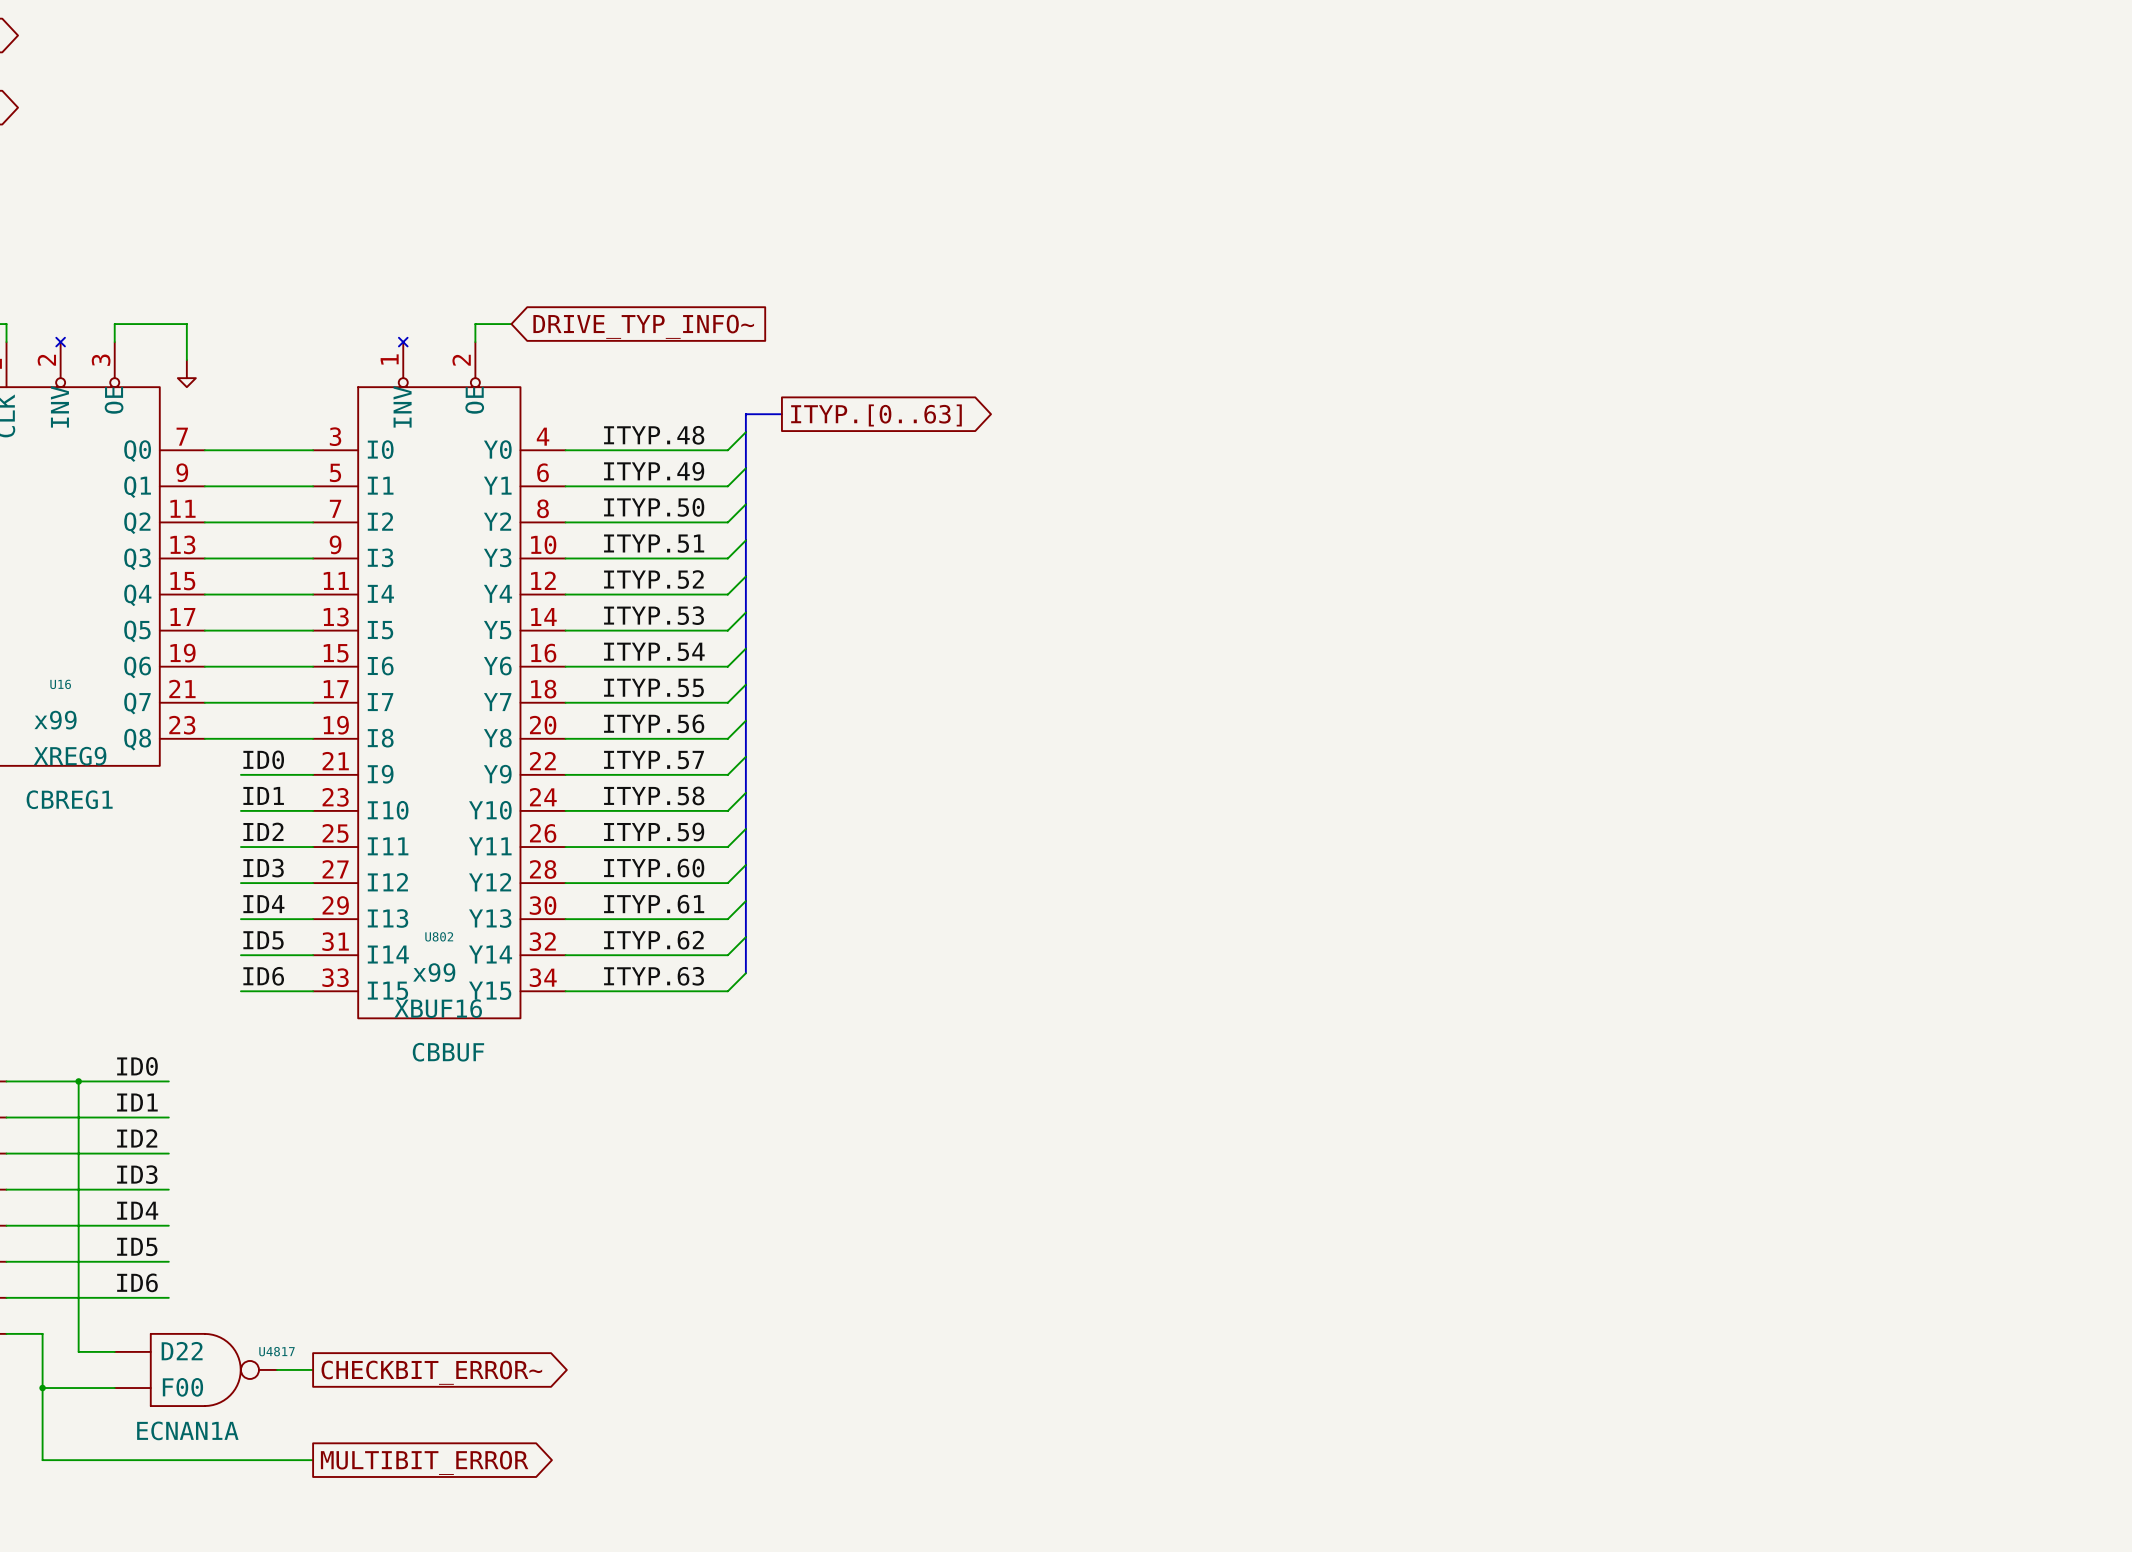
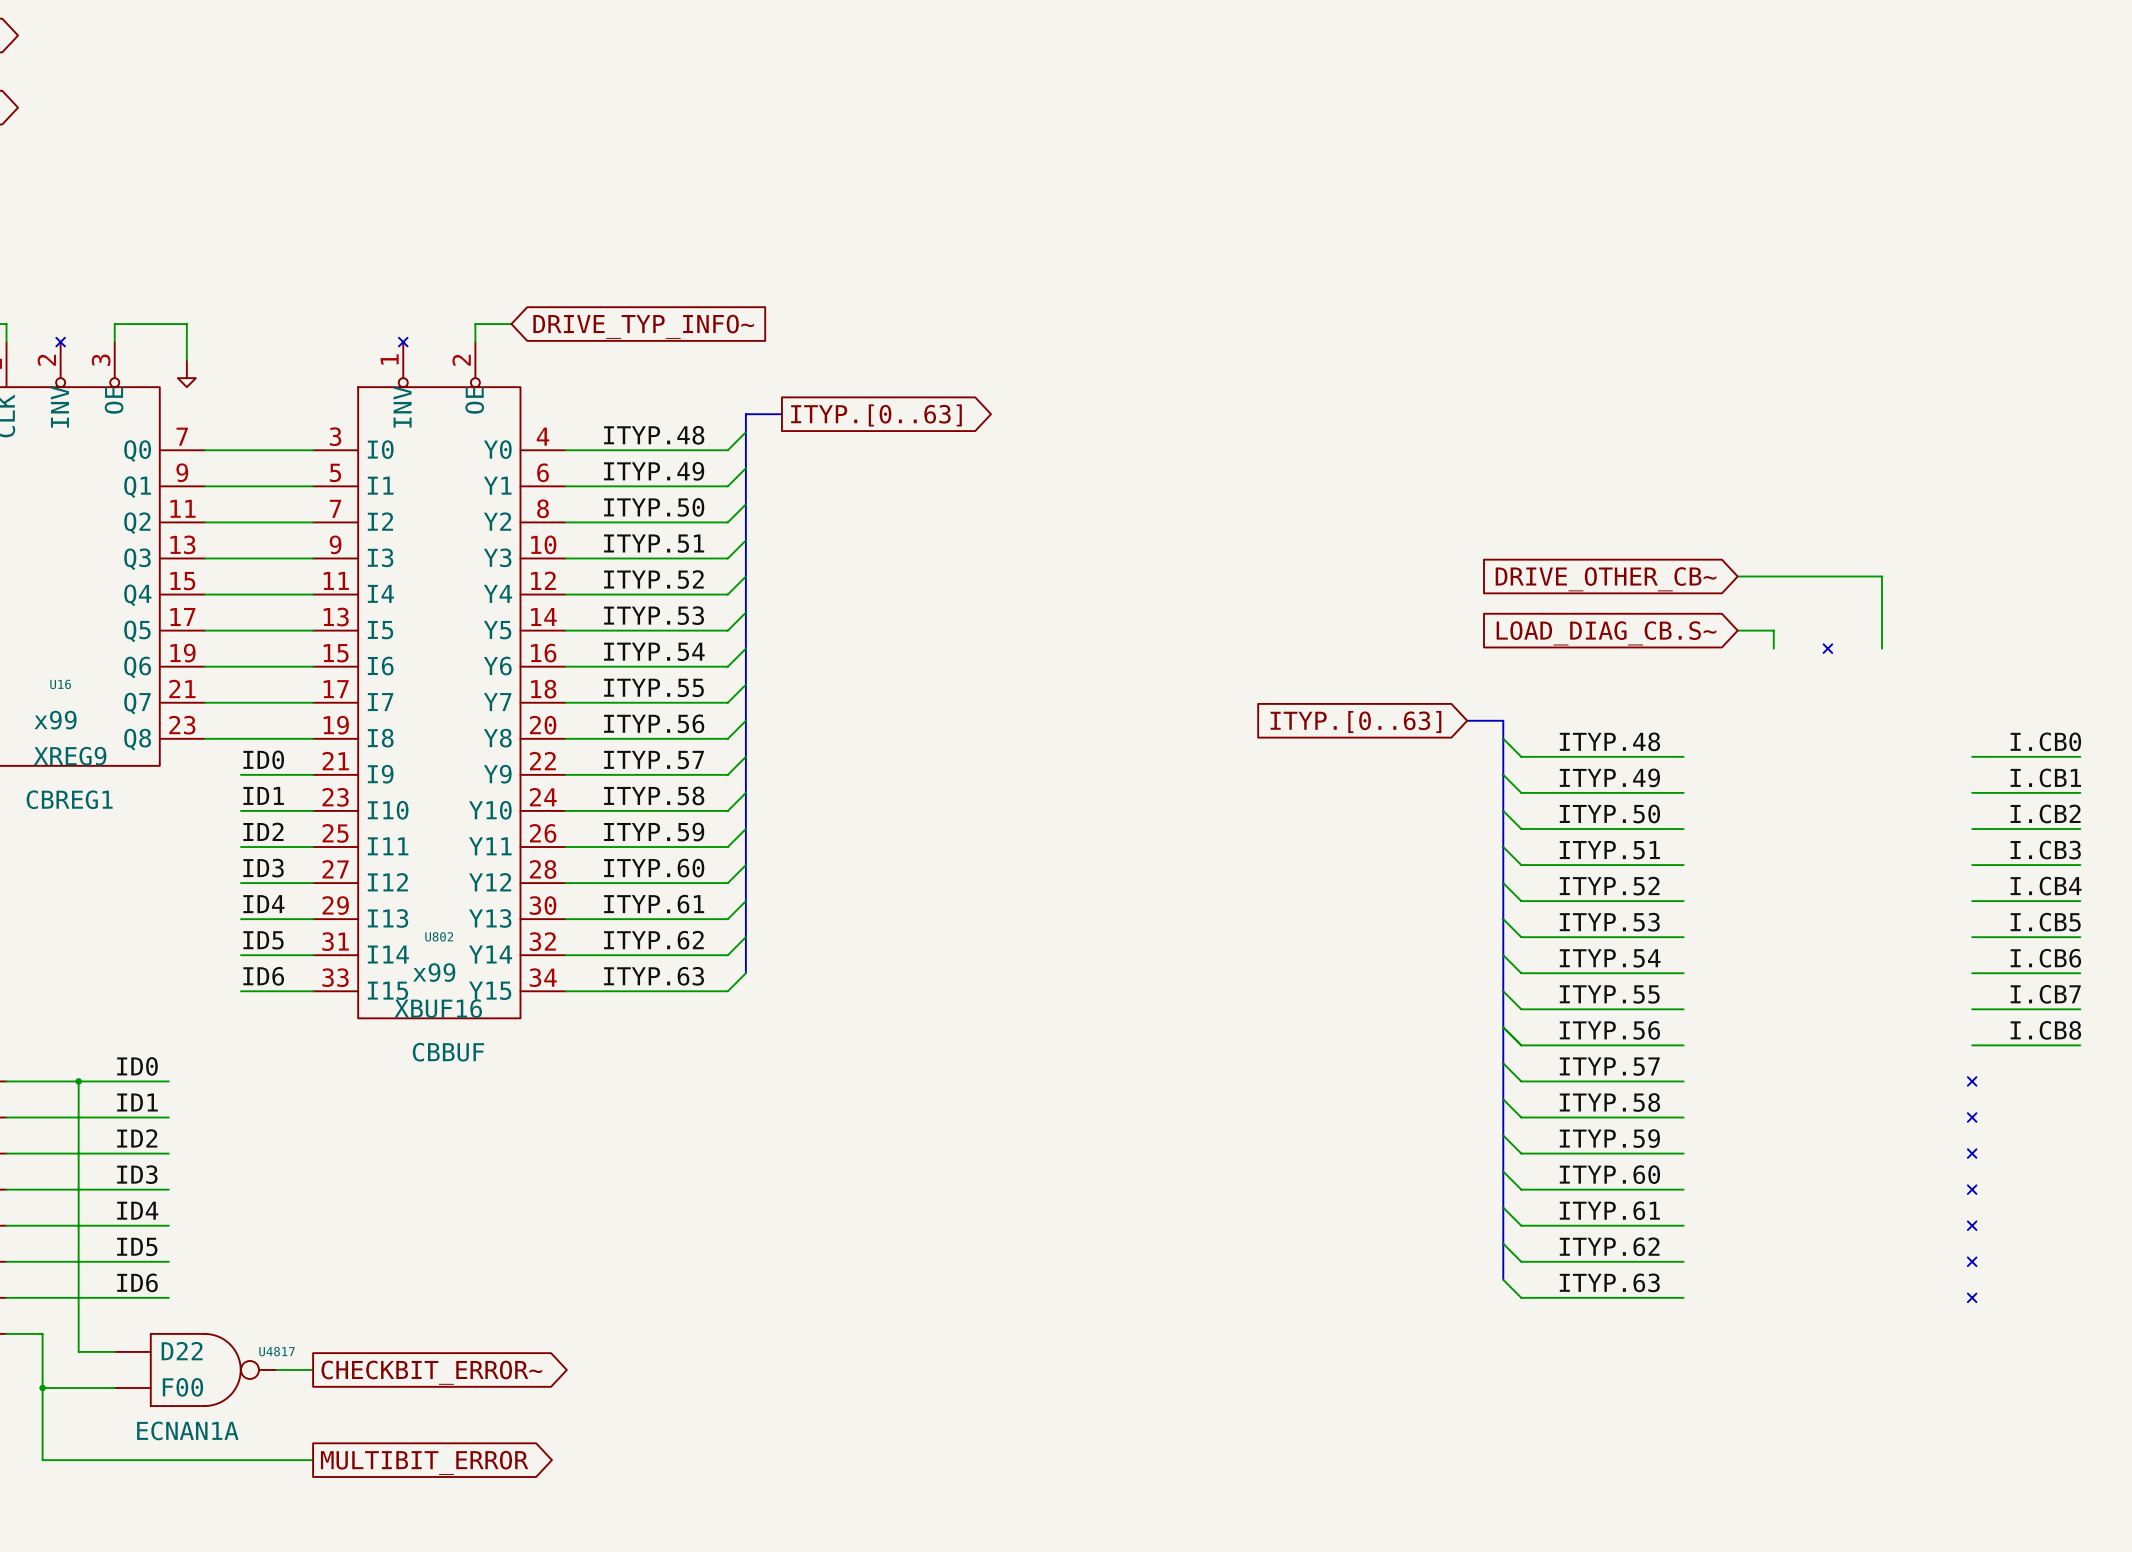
wire: none -> (1737, 576) (1881, 576) (1881, 648)
global label: none -> DRIVE_OTHER_CB~ (1606, 579)
wire: none -> (1737, 630) (1773, 630) (1773, 648)
global label: none -> LOAD_DIAG_CB.S~ (1606, 633)
no-connect mark: none -> (1827, 648)
bus: none -> (1467, 720) (1503, 720) (1503, 1279)
global label: none -> ITYP.[0..63] (1356, 722)
wire: none -> (1503, 738) (1521, 756) (1683, 756)
label: none -> ITYP.48 (1609, 741)
label: none -> I.CB0 (2045, 741)
wire: none -> (1972, 756) (2080, 756)
wire: none -> (1503, 774) (1521, 792) (1683, 792)
label: none -> ITYP.49 (1609, 777)
label: none -> I.CB1 (2045, 777)
wire: none -> (1972, 792) (2080, 792)
wire: none -> (1503, 810) (1521, 828) (1683, 828)
label: none -> ITYP.50 (1609, 813)
label: none -> I.CB2 (2045, 813)
wire: none -> (1972, 828) (2080, 828)
wire: none -> (1503, 847) (1521, 865) (1683, 865)
label: none -> ITYP.51 (1609, 850)
label: none -> I.CB3 (2045, 850)
wire: none -> (1972, 865) (2080, 865)
wire: none -> (1503, 883) (1521, 901) (1683, 901)
label: none -> ITYP.52 (1609, 886)
label: none -> I.CB4 (2046, 886)
wire: none -> (1972, 901) (2080, 901)
wire: none -> (1503, 919) (1521, 937) (1683, 937)
label: none -> ITYP.53 (1609, 922)
label: none -> I.CB5 (2045, 922)
wire: none -> (1972, 937) (2080, 937)
wire: none -> (1503, 955) (1521, 973) (1683, 973)
label: none -> ITYP.54 (1610, 958)
label: none -> I.CB6 (2045, 958)
wire: none -> (1972, 973) (2080, 973)
wire: none -> (1503, 991) (1521, 1009) (1683, 1009)
label: none -> ITYP.55 (1609, 994)
label: none -> I.CB7 (2045, 994)
wire: none -> (1972, 1009) (2080, 1009)
wire: none -> (1503, 1027) (1521, 1045) (1683, 1045)
label: none -> ITYP.56 (1609, 1030)
label: none -> I.CB8 (2045, 1030)
wire: none -> (1972, 1045) (2080, 1045)
wire: none -> (1503, 1063) (1521, 1081) (1683, 1081)
label: none -> ITYP.57 (1609, 1066)
no-connect mark: none -> (1972, 1081)
wire: none -> (1503, 1099) (1521, 1117) (1683, 1117)
label: none -> ITYP.58 (1609, 1102)
no-connect mark: none -> (1972, 1117)
wire: none -> (1503, 1135) (1521, 1153) (1683, 1153)
label: none -> ITYP.59 (1609, 1138)
no-connect mark: none -> (1972, 1153)
wire: none -> (1503, 1171) (1521, 1189) (1683, 1189)
label: none -> ITYP.60 (1609, 1174)
no-connect mark: none -> (1972, 1189)
wire: none -> (1503, 1207) (1521, 1225) (1683, 1225)
label: none -> ITYP.61 (1609, 1210)
no-connect mark: none -> (1972, 1225)
wire: none -> (1503, 1243) (1521, 1261) (1683, 1261)
label: none -> ITYP.62 (1609, 1246)
no-connect mark: none -> (1972, 1261)
wire: none -> (1503, 1279) (1521, 1297) (1683, 1297)
label: none -> ITYP.63 (1609, 1282)
no-connect mark: none -> (1972, 1297)

